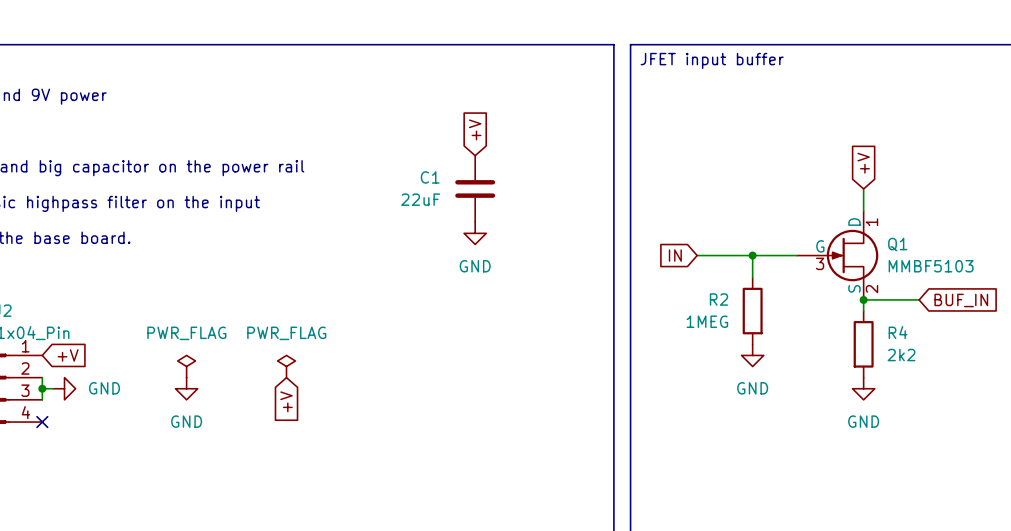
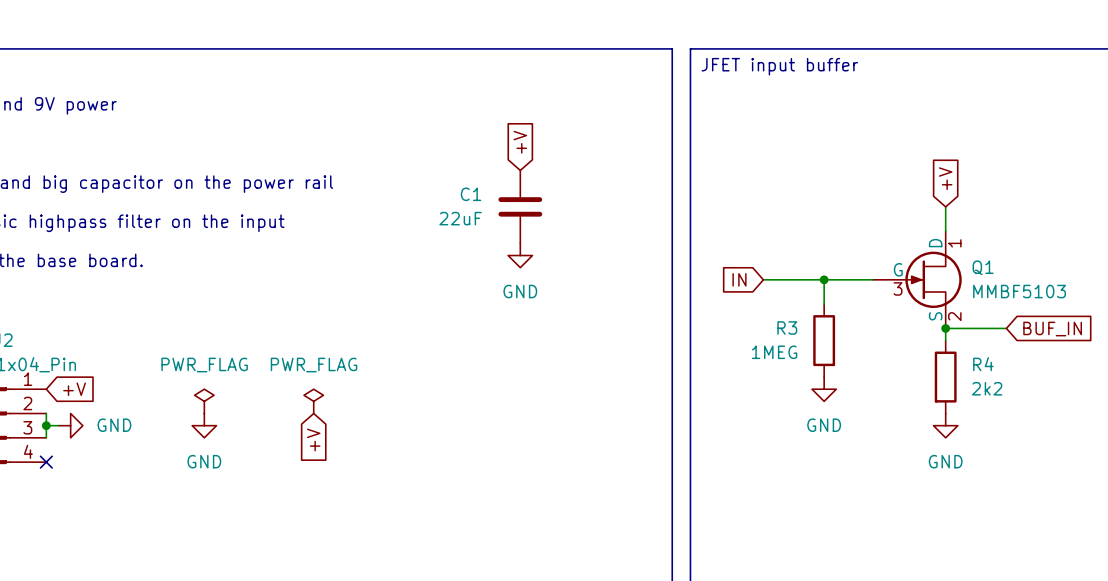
R2 name: R2 (719, 299) -> R3 (787, 327)

